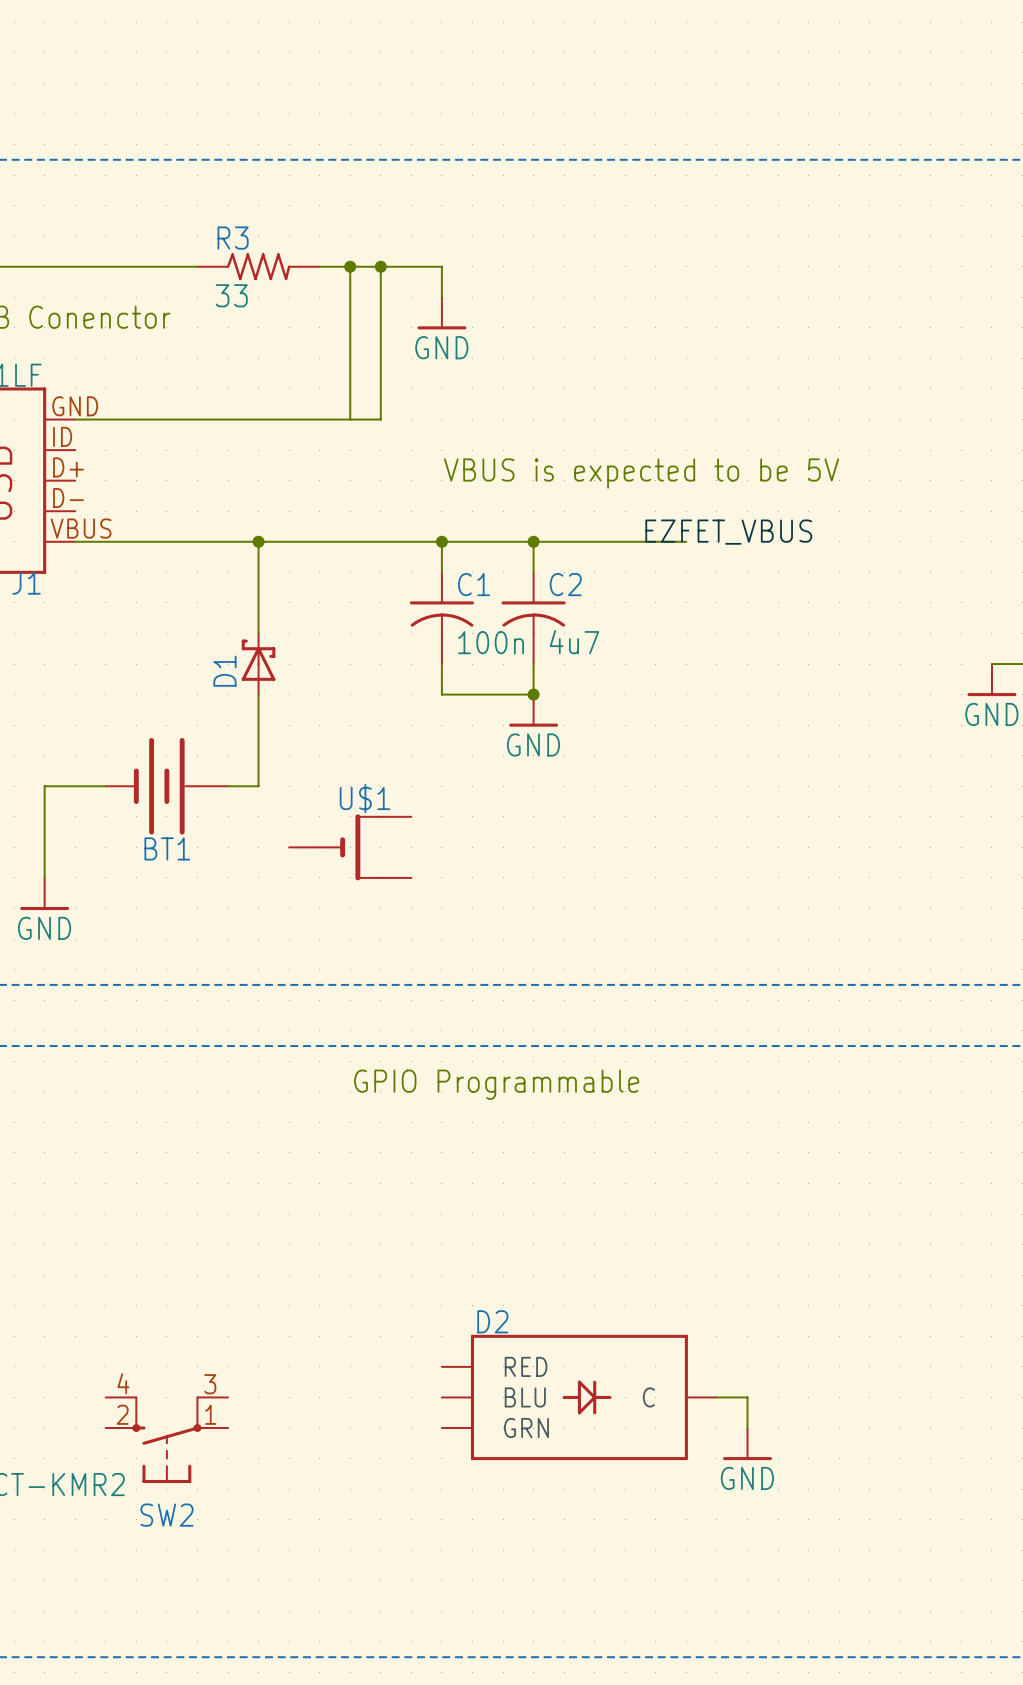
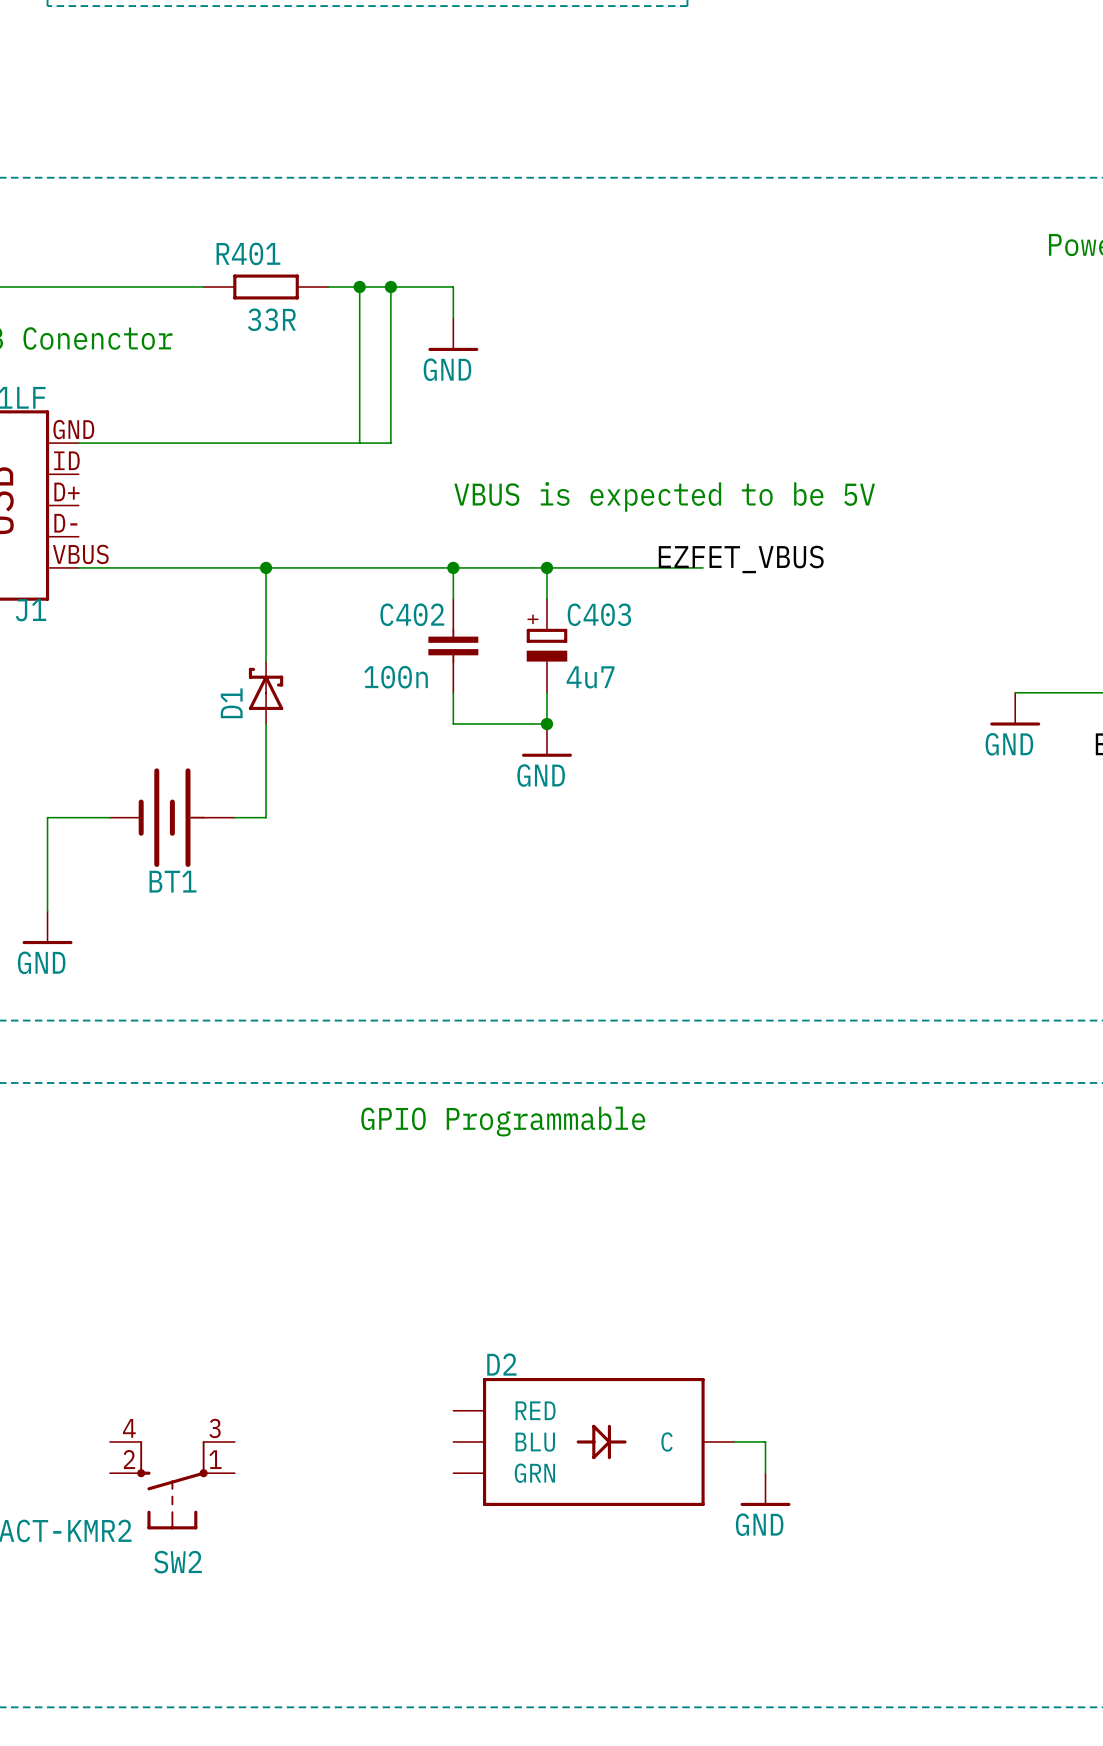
R3: 33 (258, 266) -> none
R401: none -> 33R (266, 286)
C1: 100n (441, 618) -> none
C402: none -> 100n (453, 645)
C2: 4u7 (533, 618) -> none
C403: none -> 4u7 (546, 645)
U$1: (350, 847) -> none

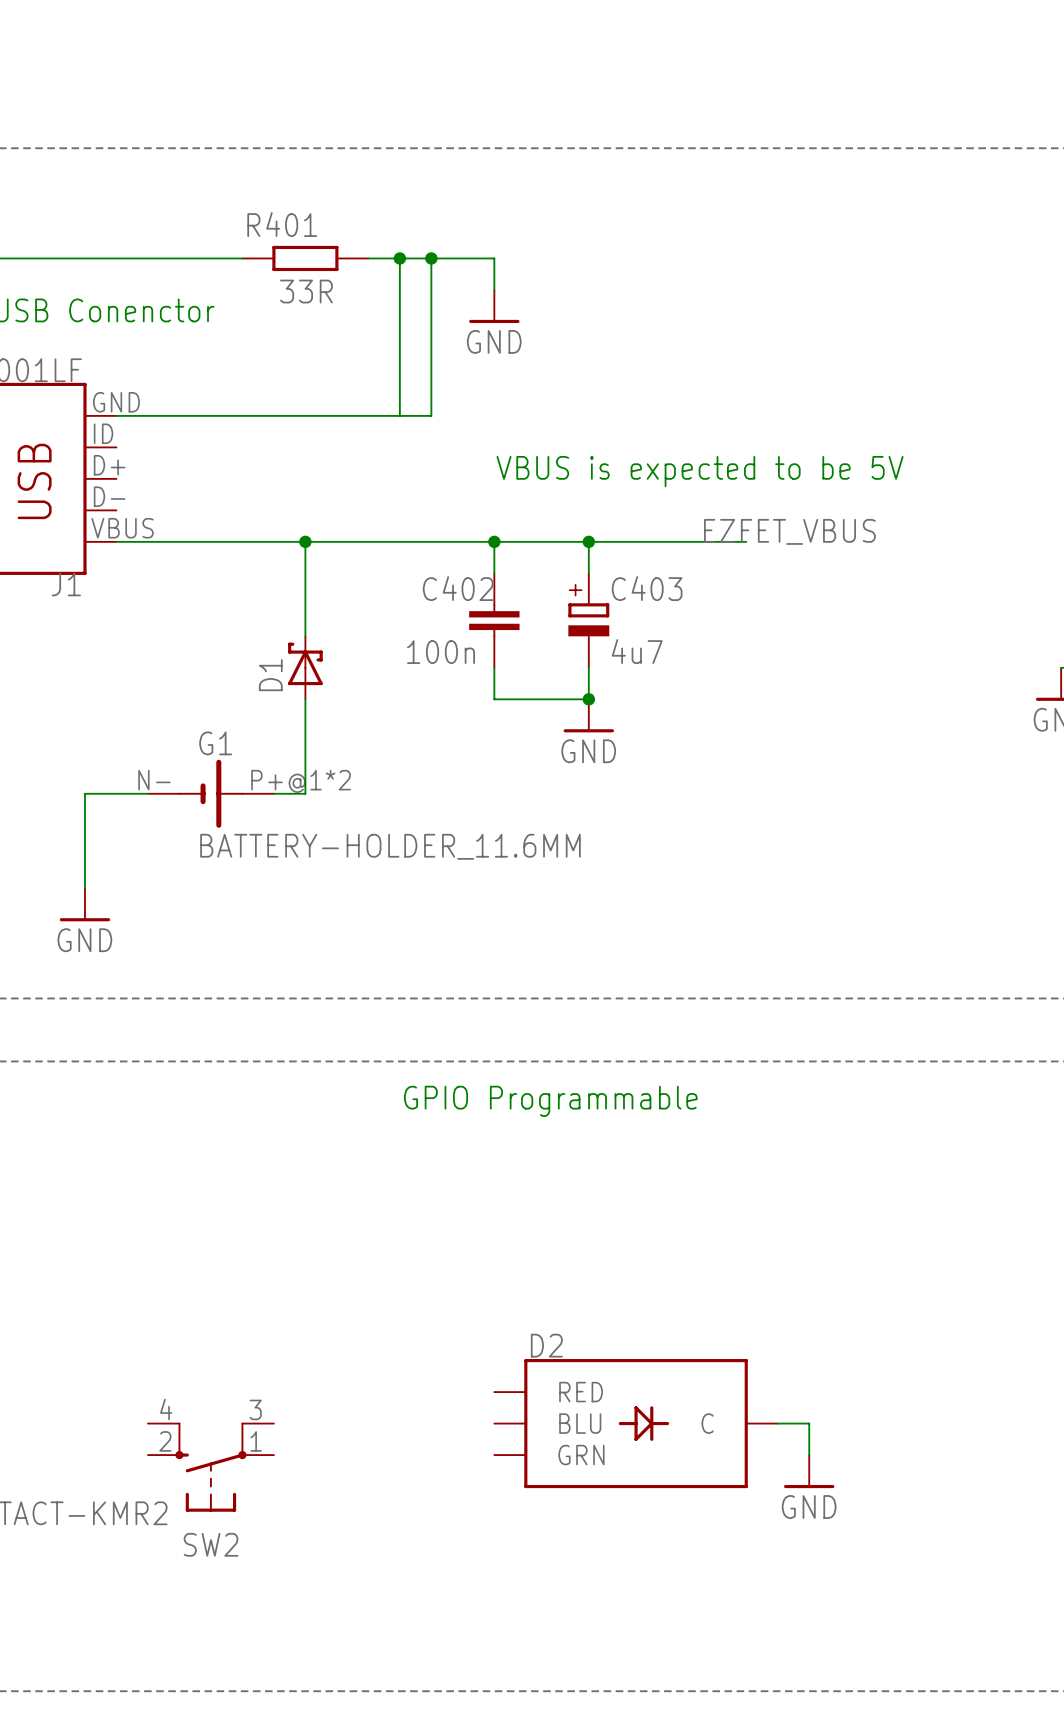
BT1: (172, 817) -> none
G1: none -> BATTERY-HOLDER_11.6MM (210, 793)

